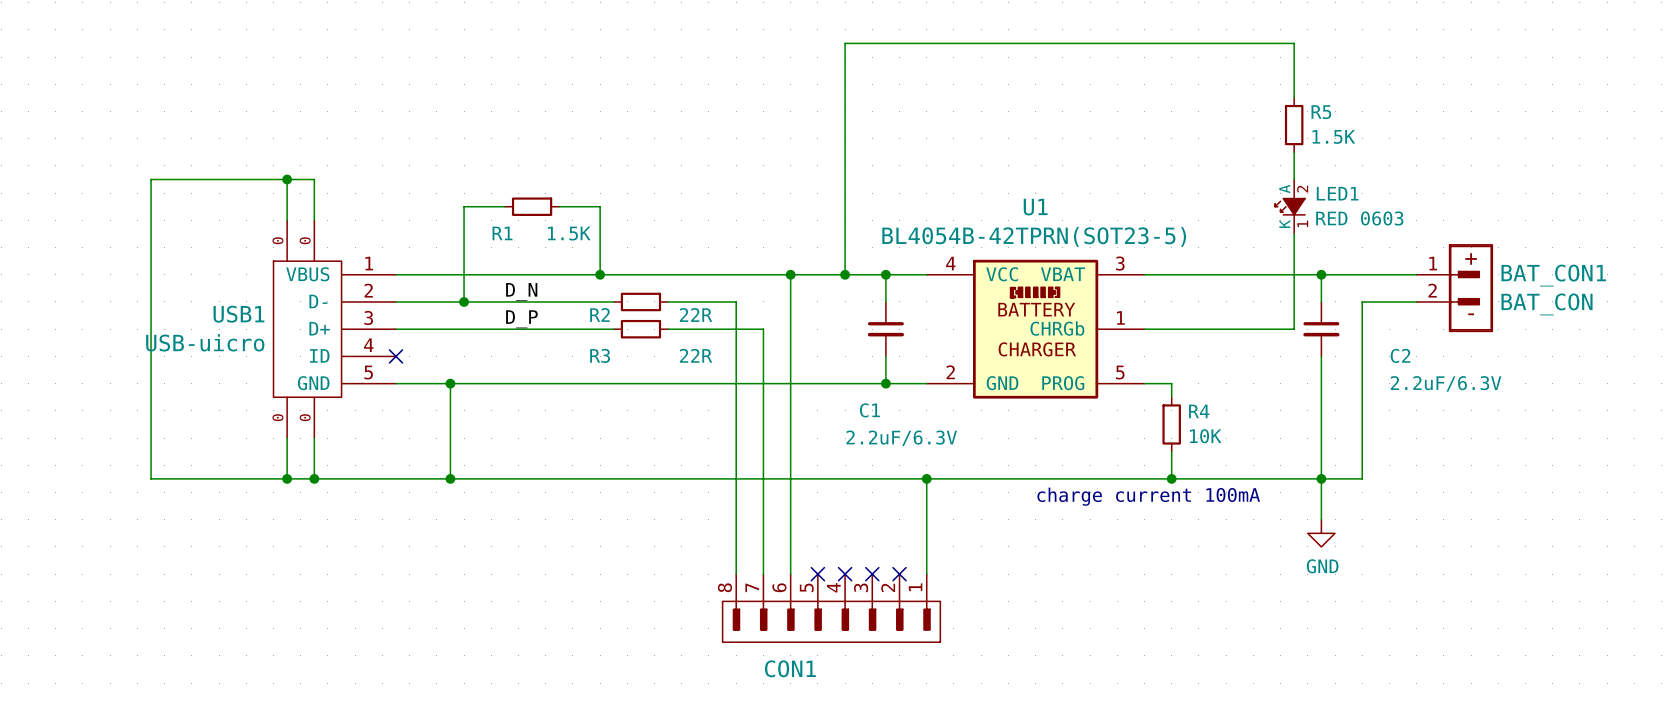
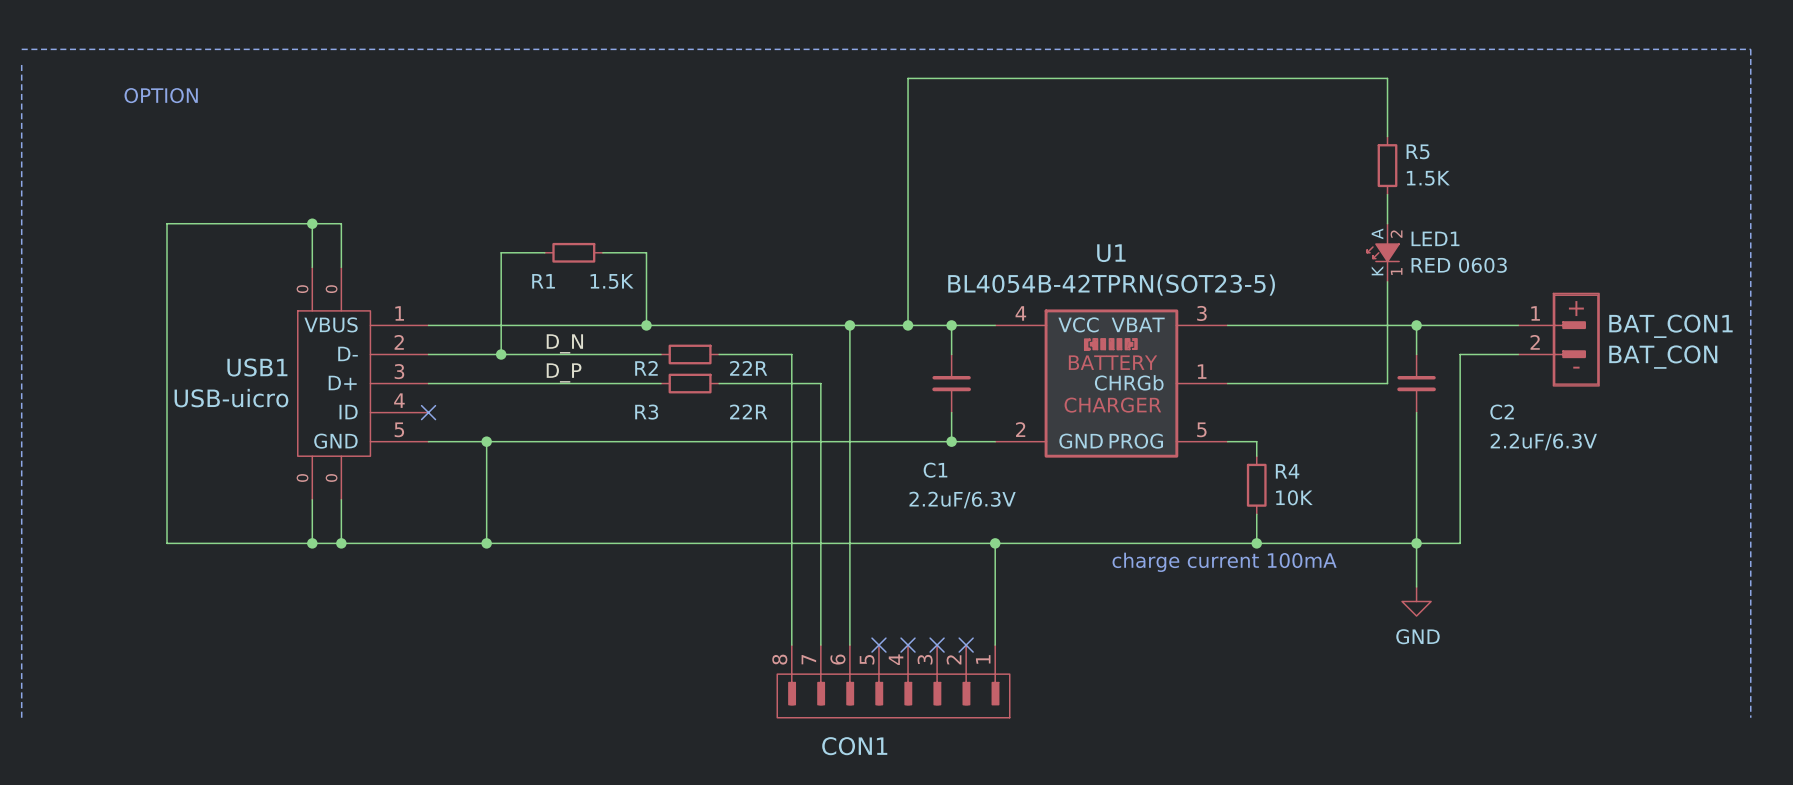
line: none -> (21, 49) (1750, 49) (1750, 717)
line: none -> (21, 63) (21, 717)
text: none -> OPTION (161, 95)

